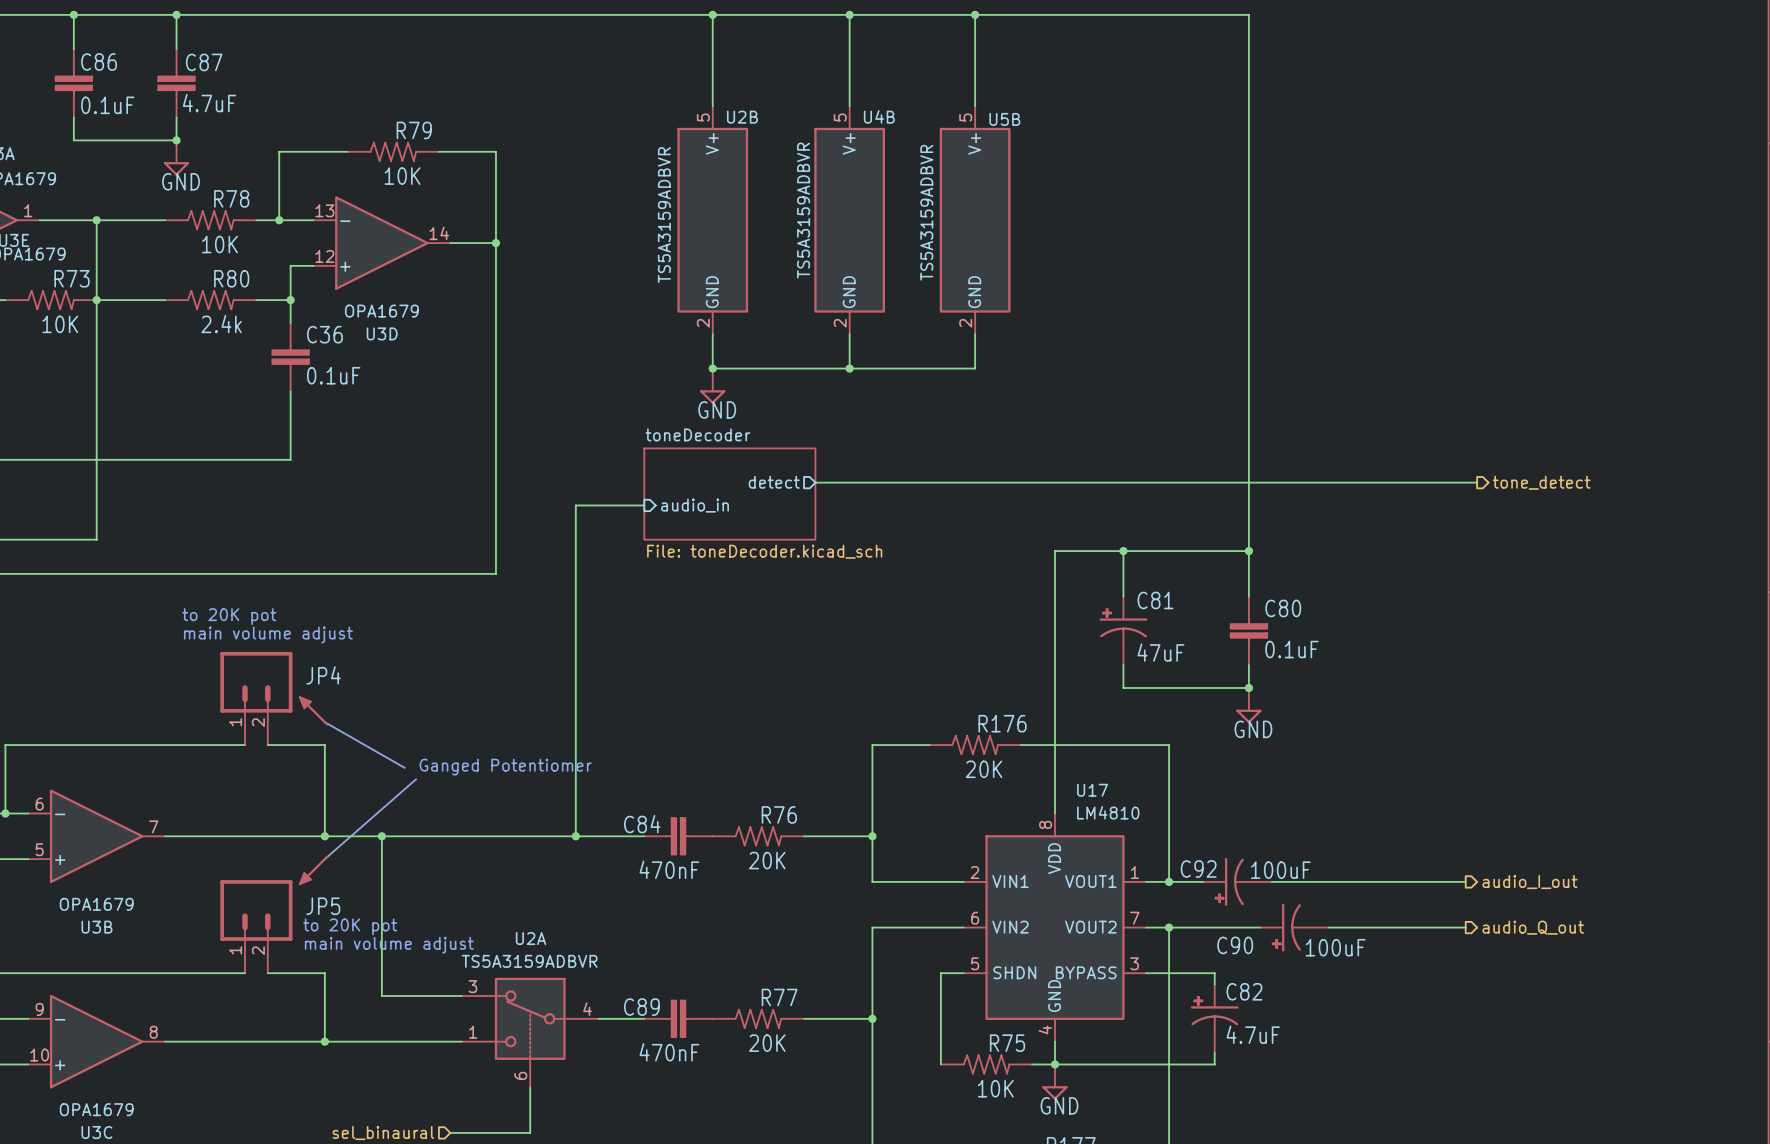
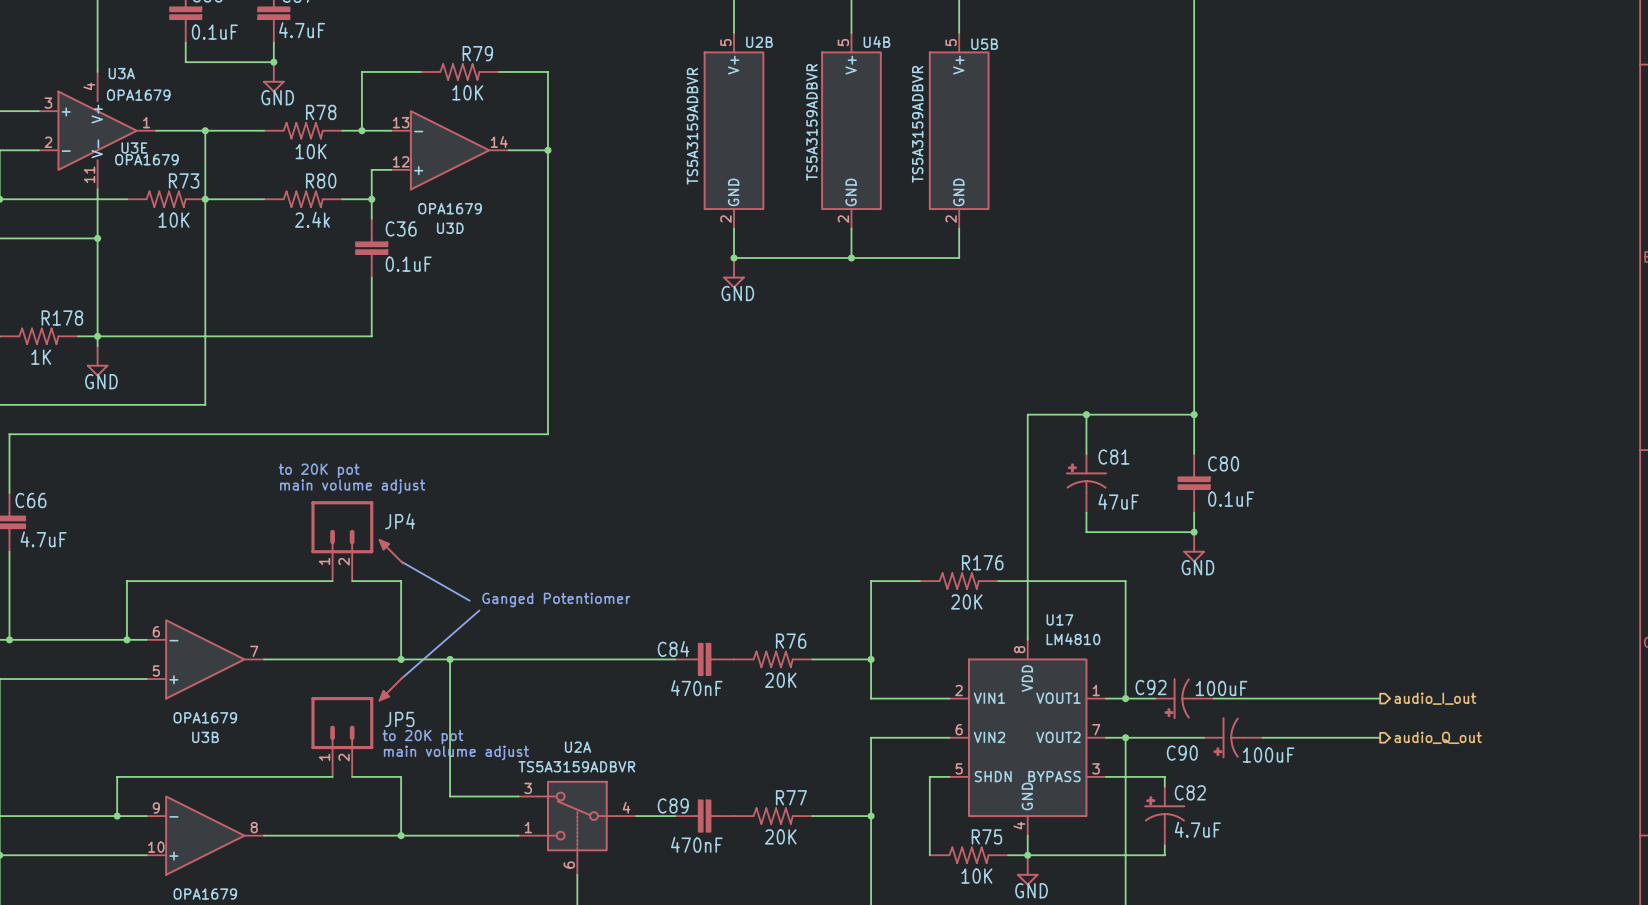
sheet pin: detect (774, 482) -> none
wire: (815, 482) (1477, 482) -> none
hierarchical label: tone_detect (1541, 482) -> none
sheet toneDecoder: File: toneDecoder.kicad_sch (729, 494) -> none
wire: (644, 505) (575, 505) (575, 836) -> none
sheet pin: audio_in (694, 505) -> none
junction: (575, 836) -> none

